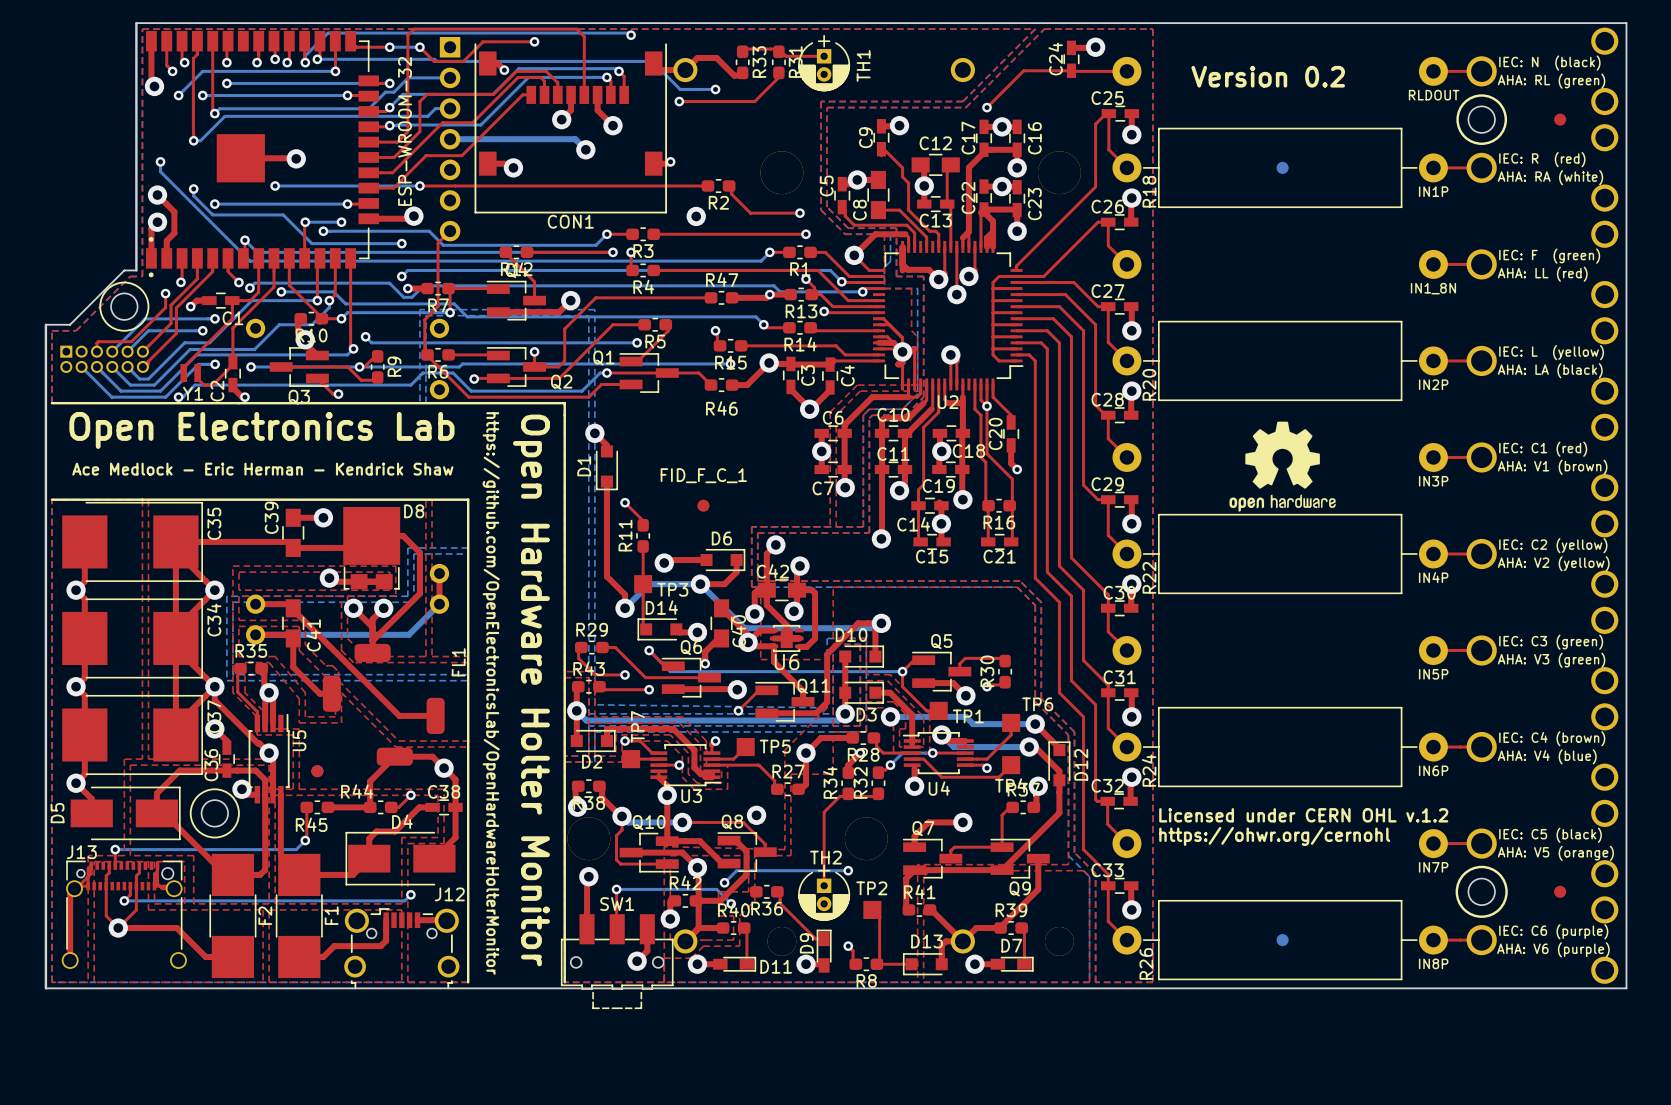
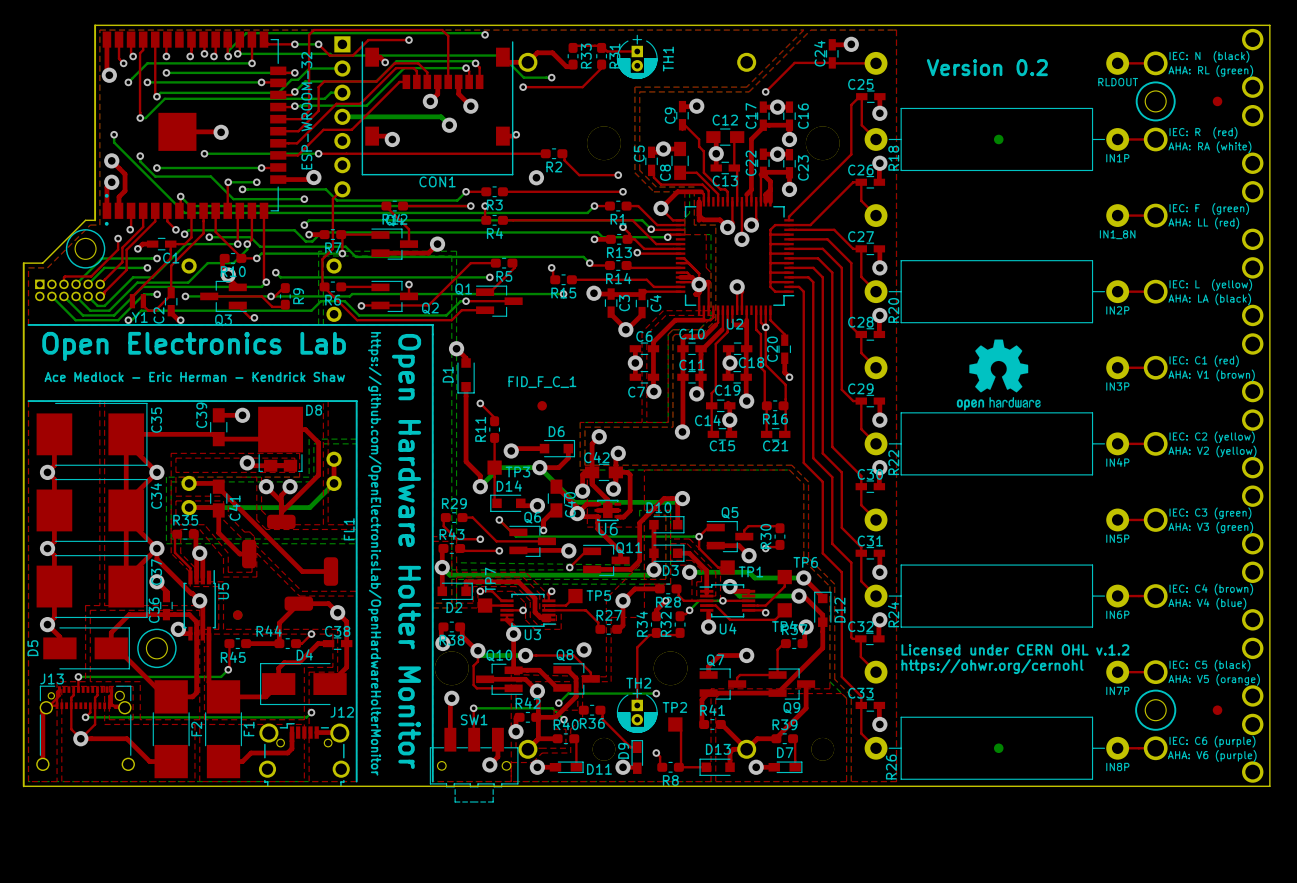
top track: (769, 294) (766, 297) (732, 297) -> none
top track: (711, 297) (595, 297) (564, 328) (564, 360) (558, 366) (534, 366) -> none
R47: (721, 297) -> none
top track: (769, 362) (747, 385) (732, 385) -> none
top track: (667, 373) (698, 373) (711, 385) -> none
R46: (721, 385) -> none

